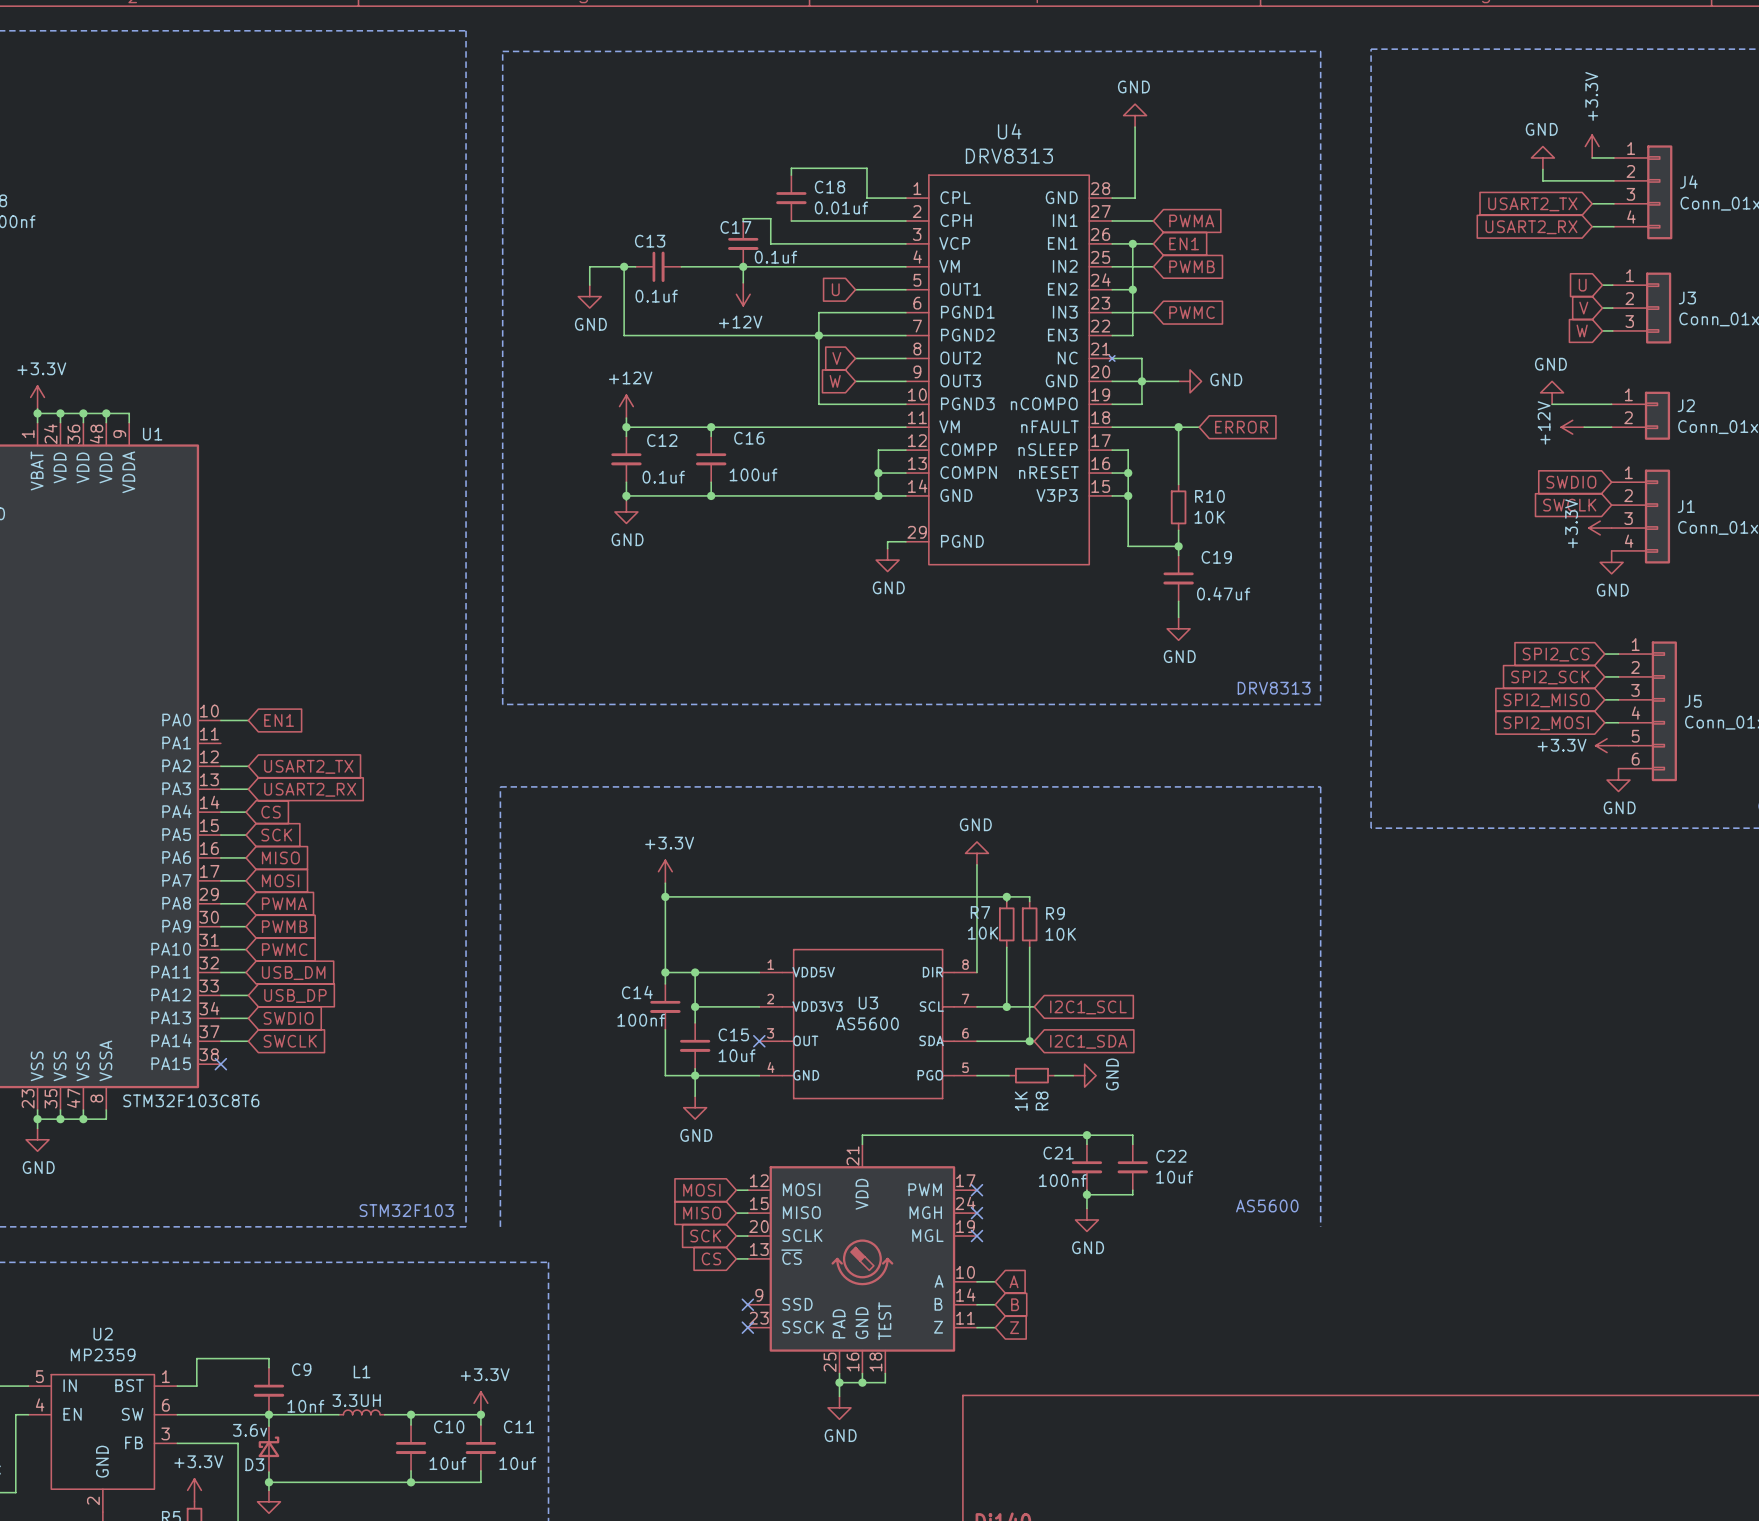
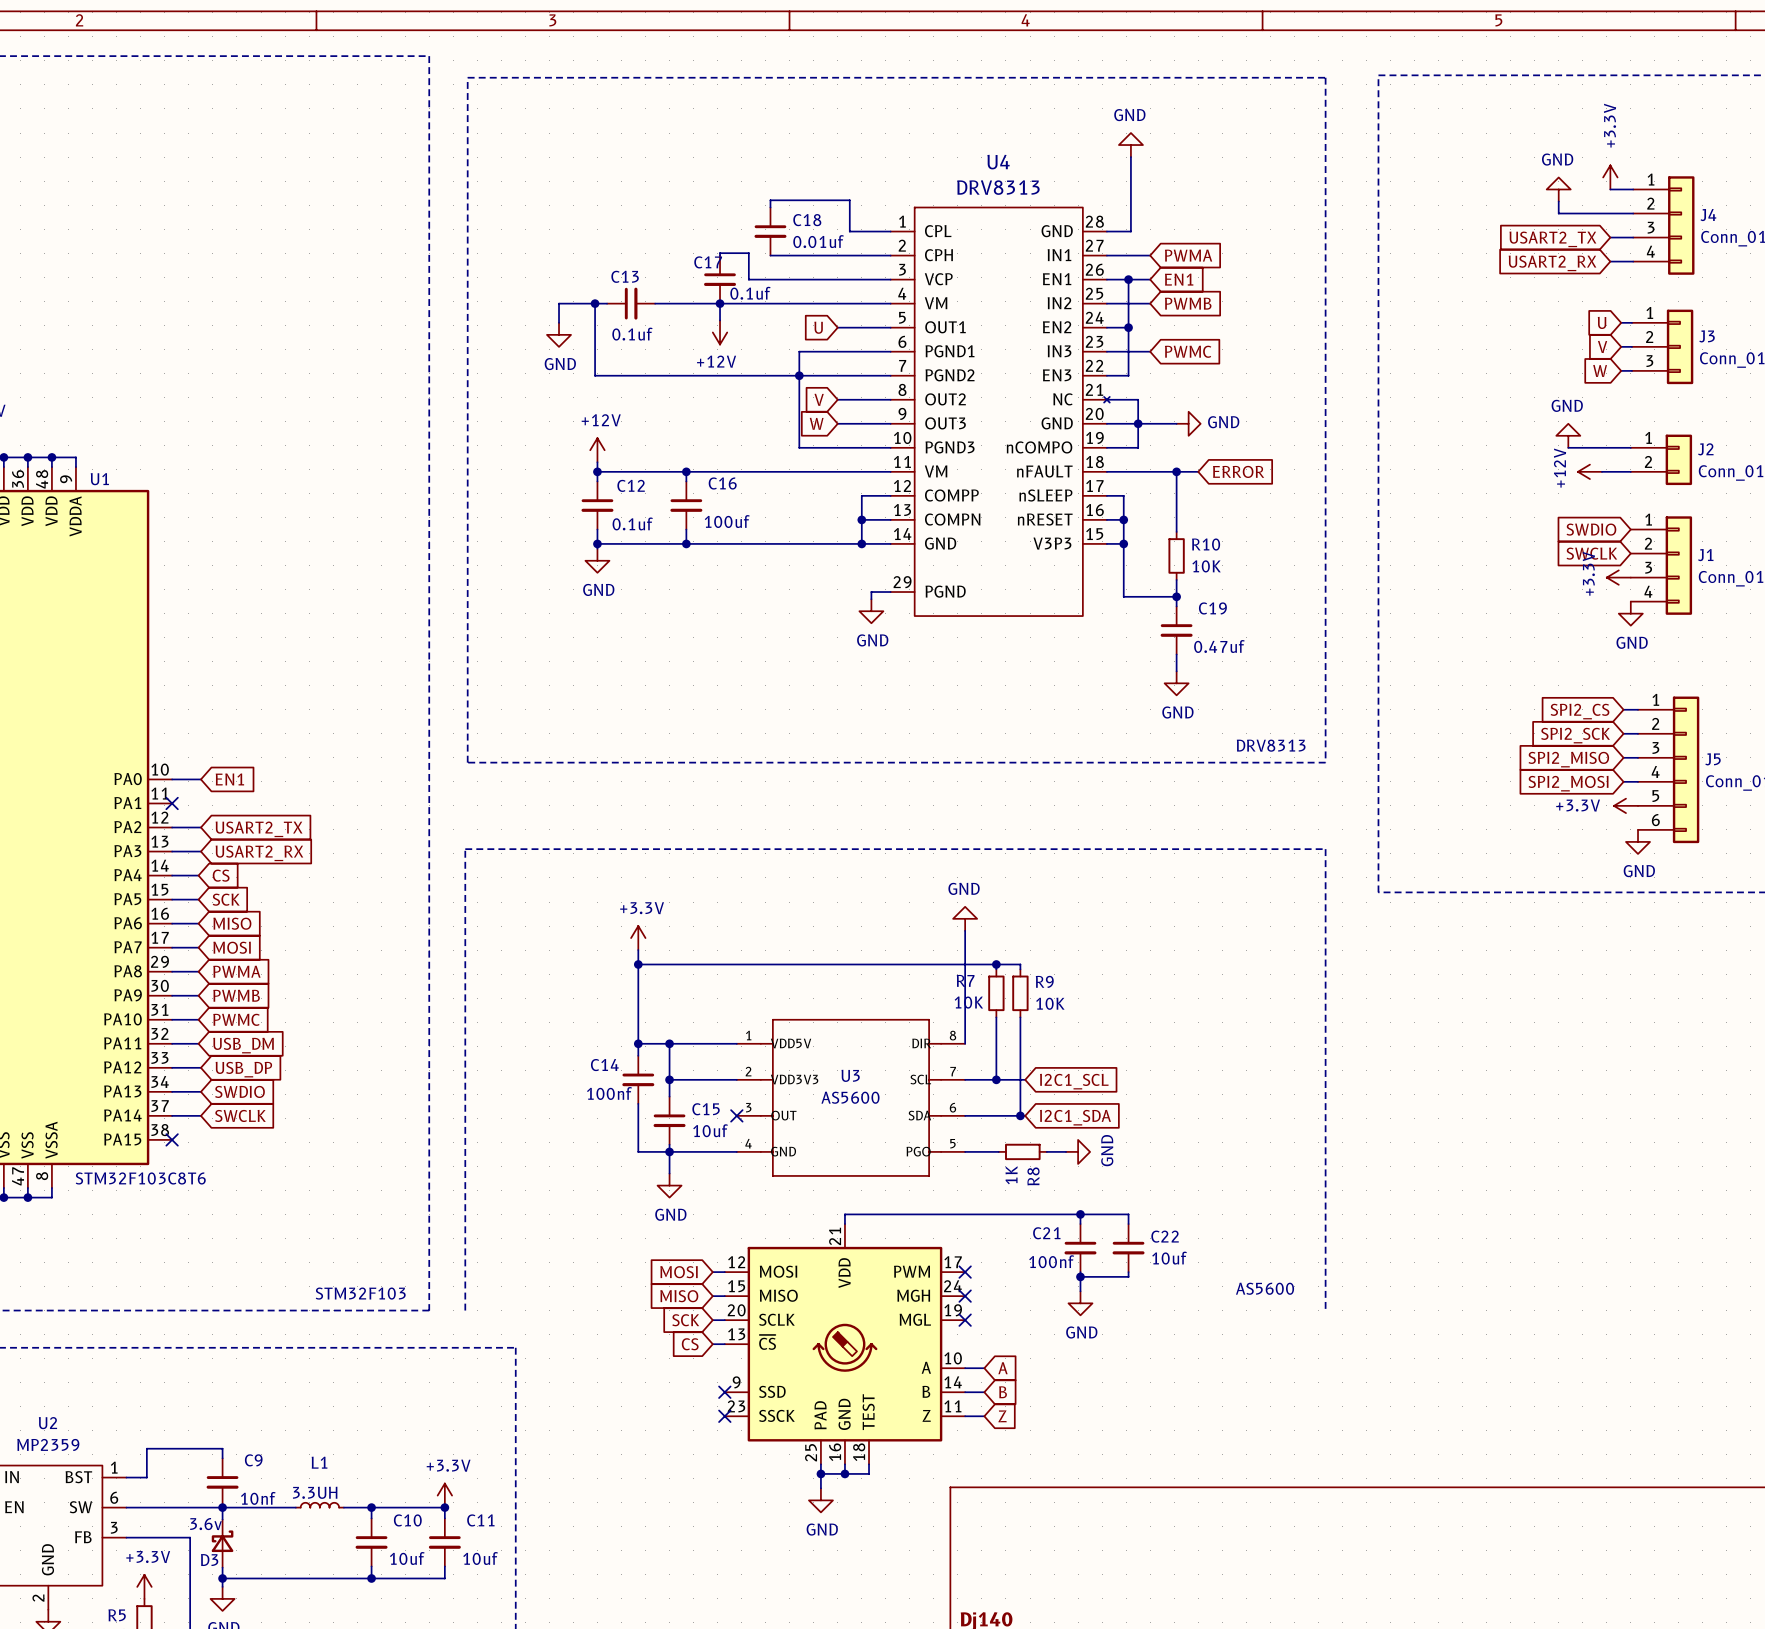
no-connect mark: none -> (172, 803)

